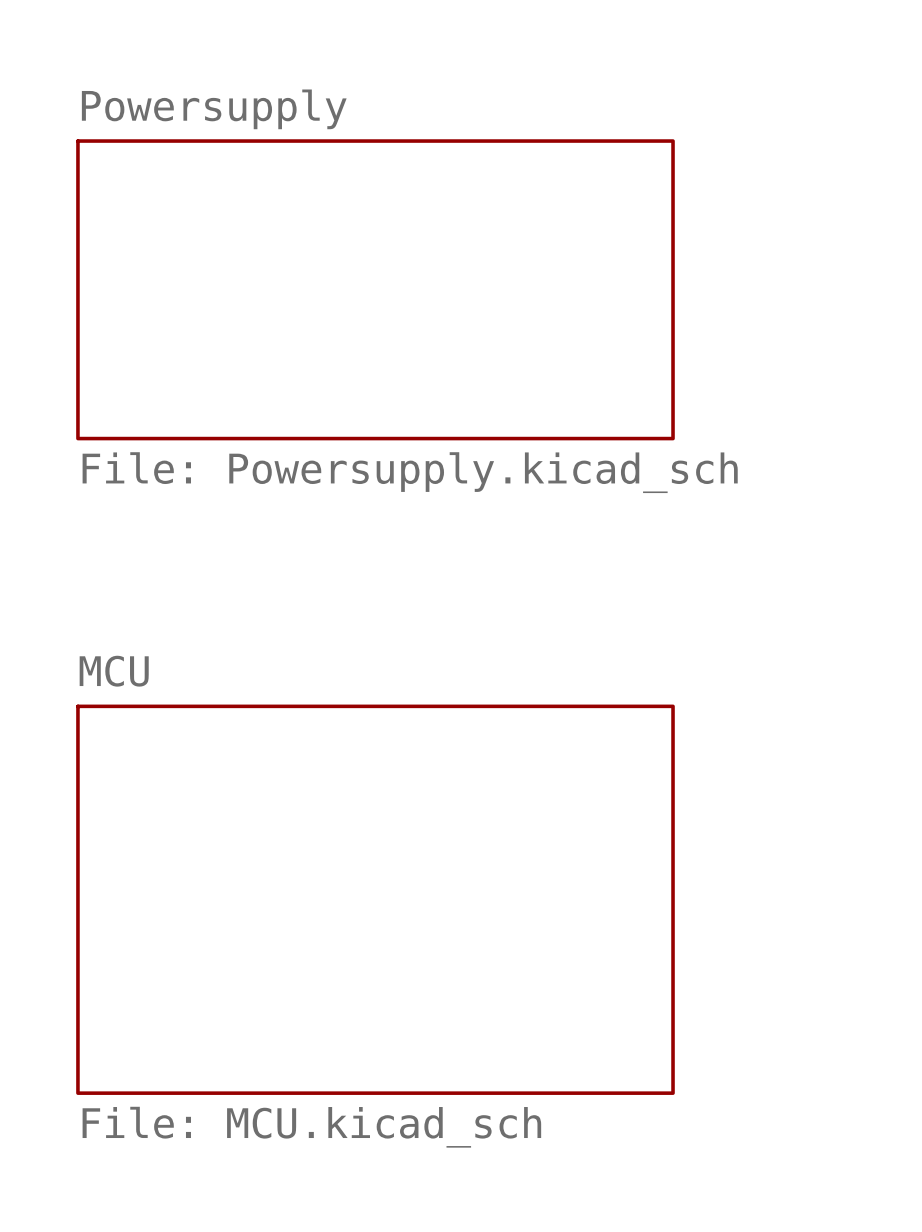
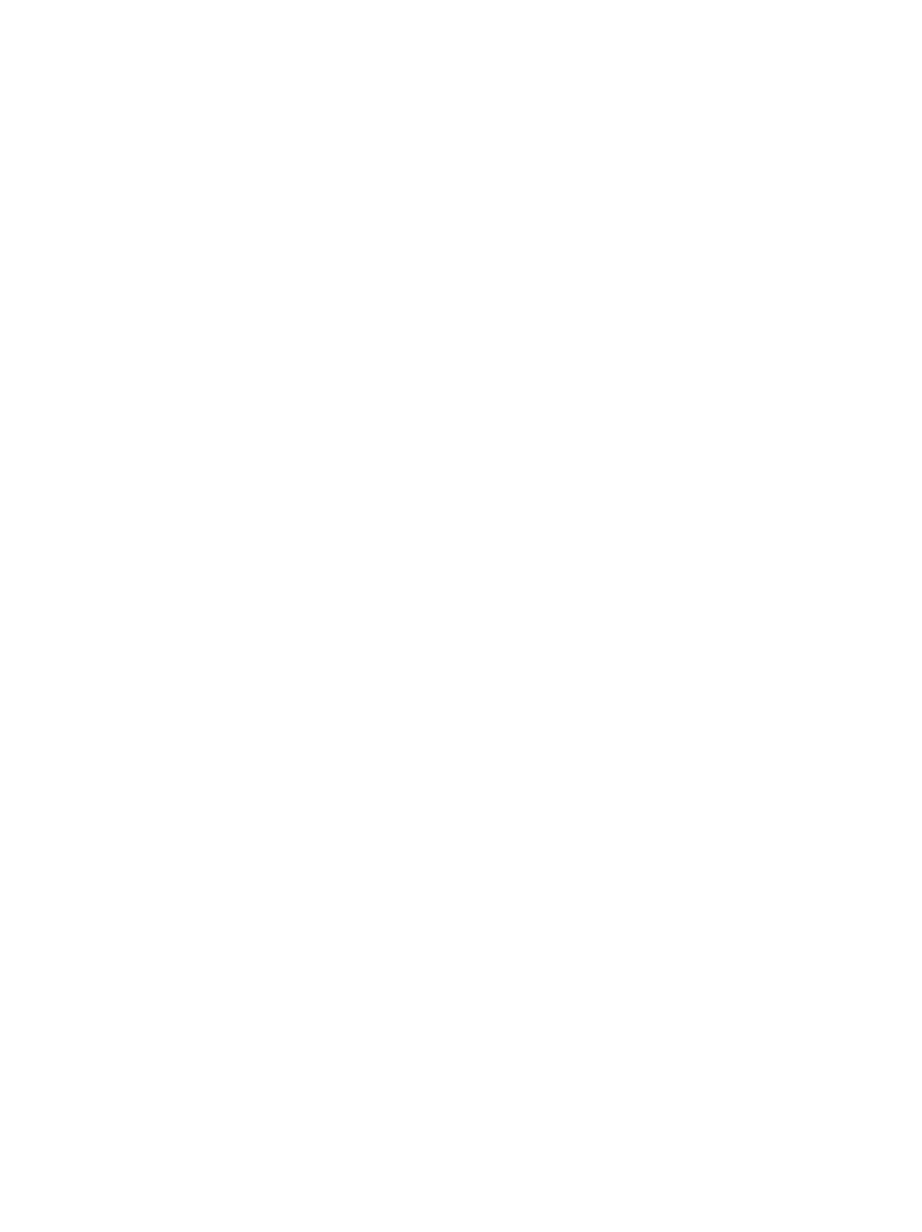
sheet Powersupply: File: Powersupply.kicad_sch (375, 289) -> none
sheet MCU: File: MCU.kicad_sch (375, 899) -> none

